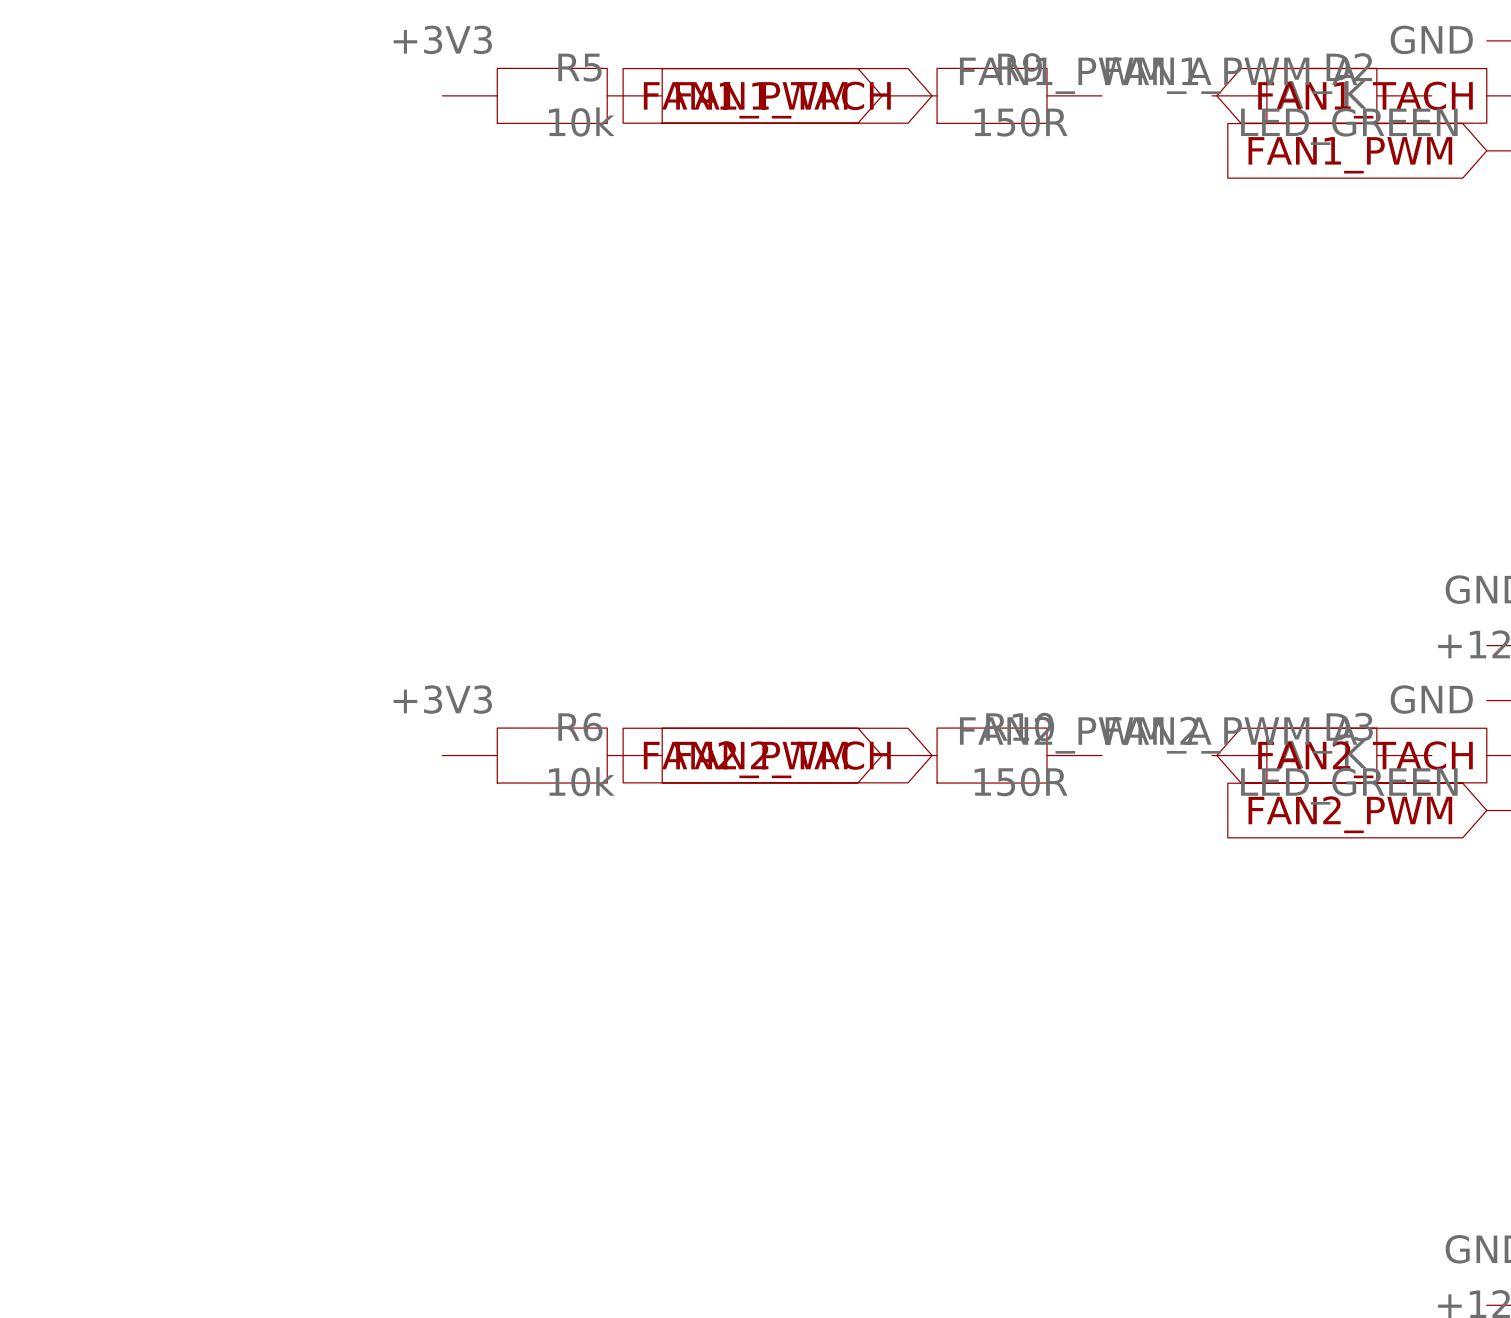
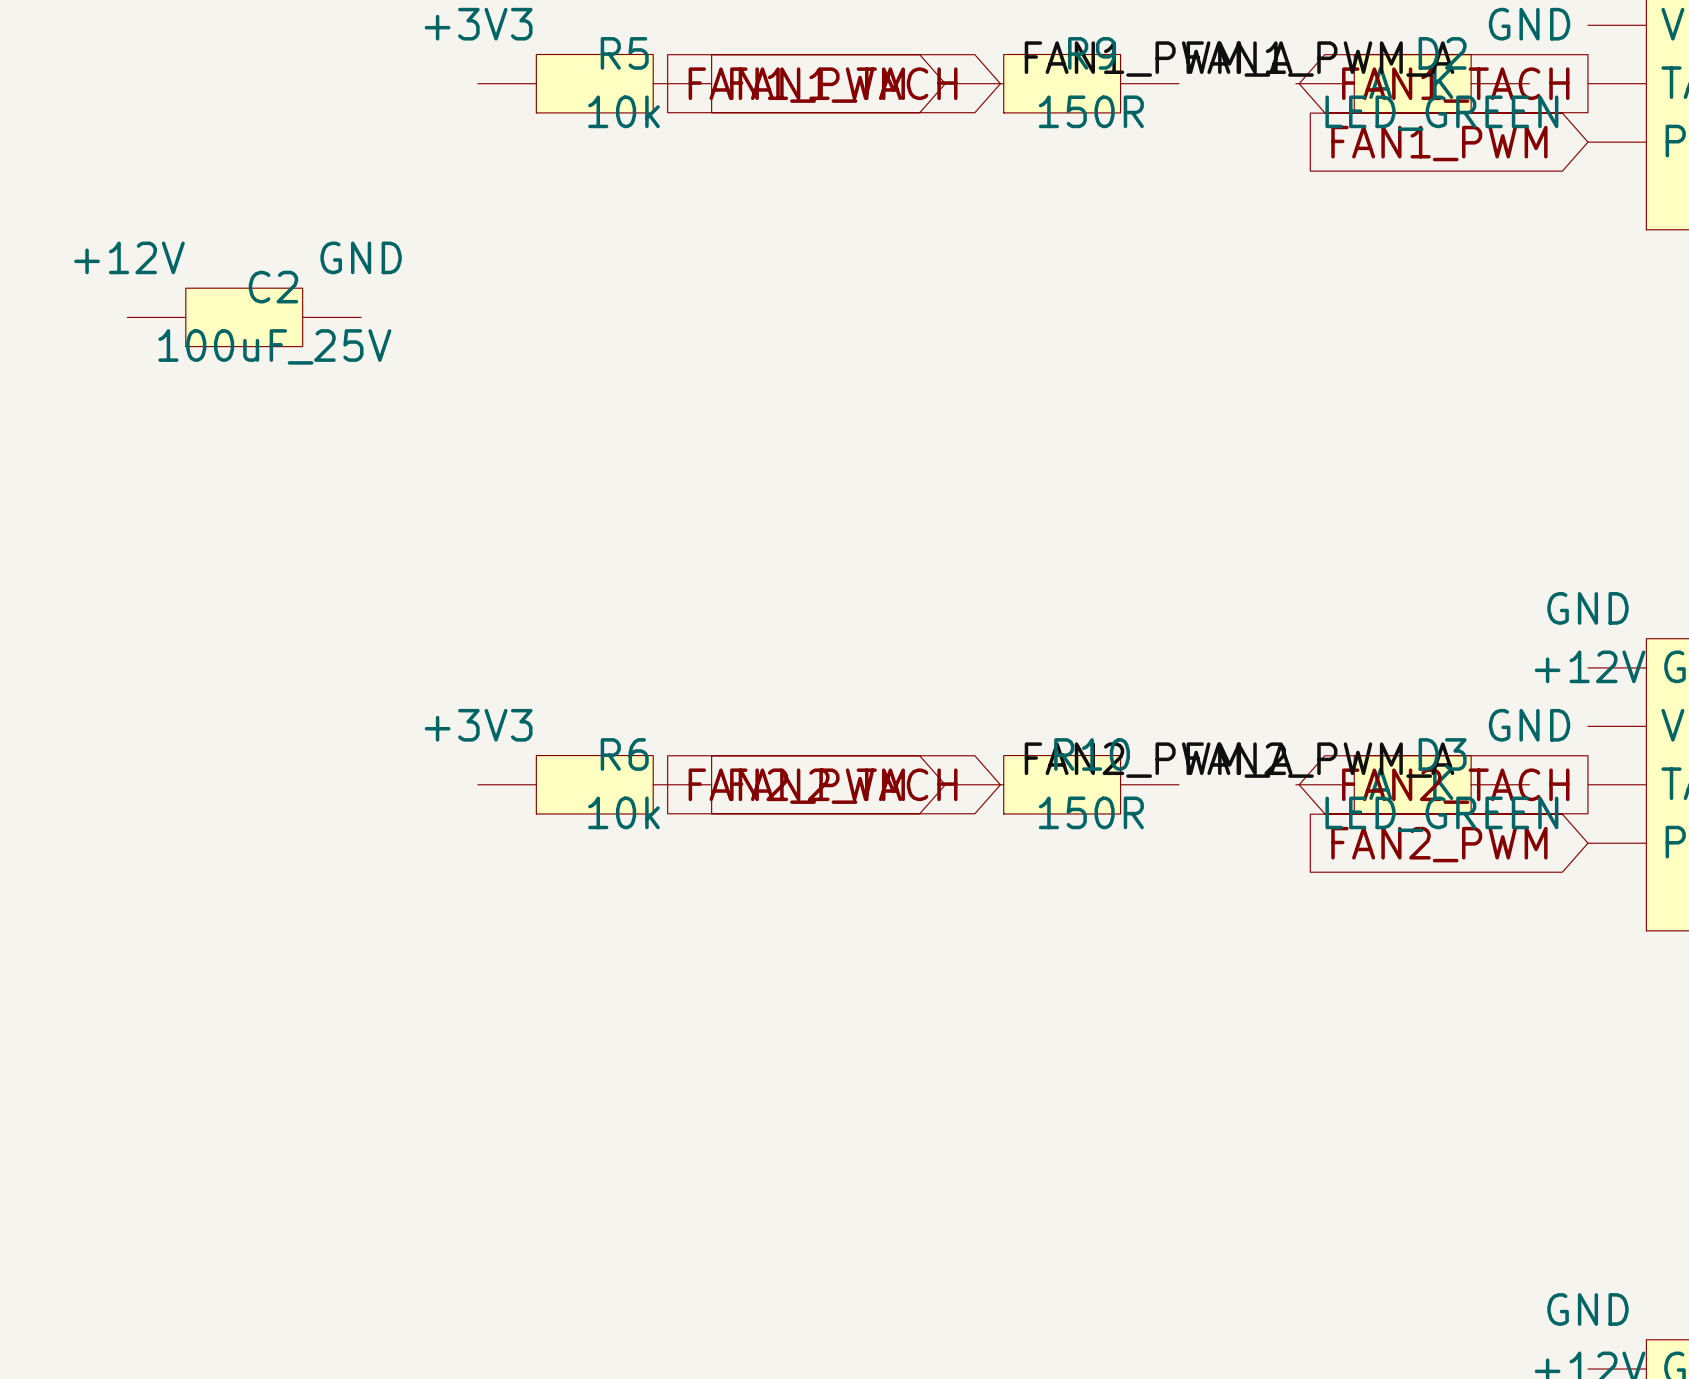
power symbol: none -> +12V (129, 257)
power symbol: none -> GND (361, 257)
C2: none -> 100uF_25V (244, 317)

